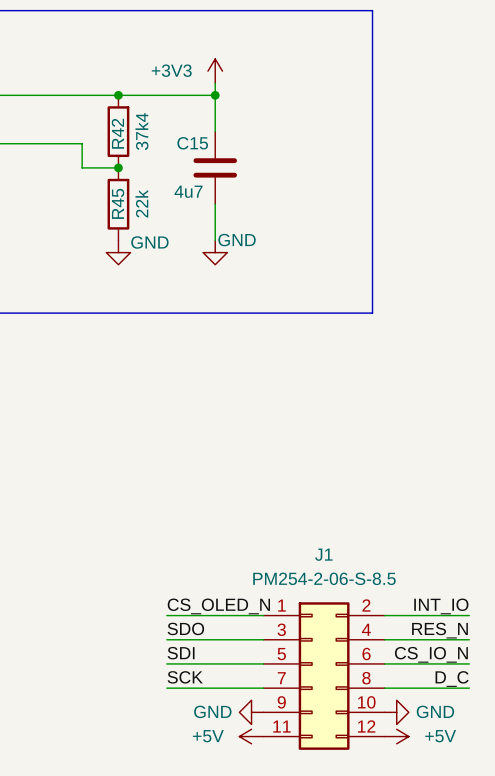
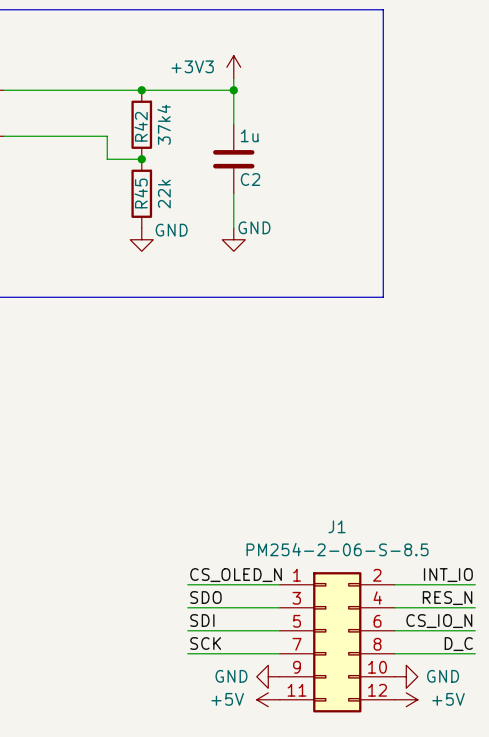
C15 name: C15 (192, 143) -> C2 (250, 179)
C15 value: 4u7 (188, 191) -> 1u (249, 135)

